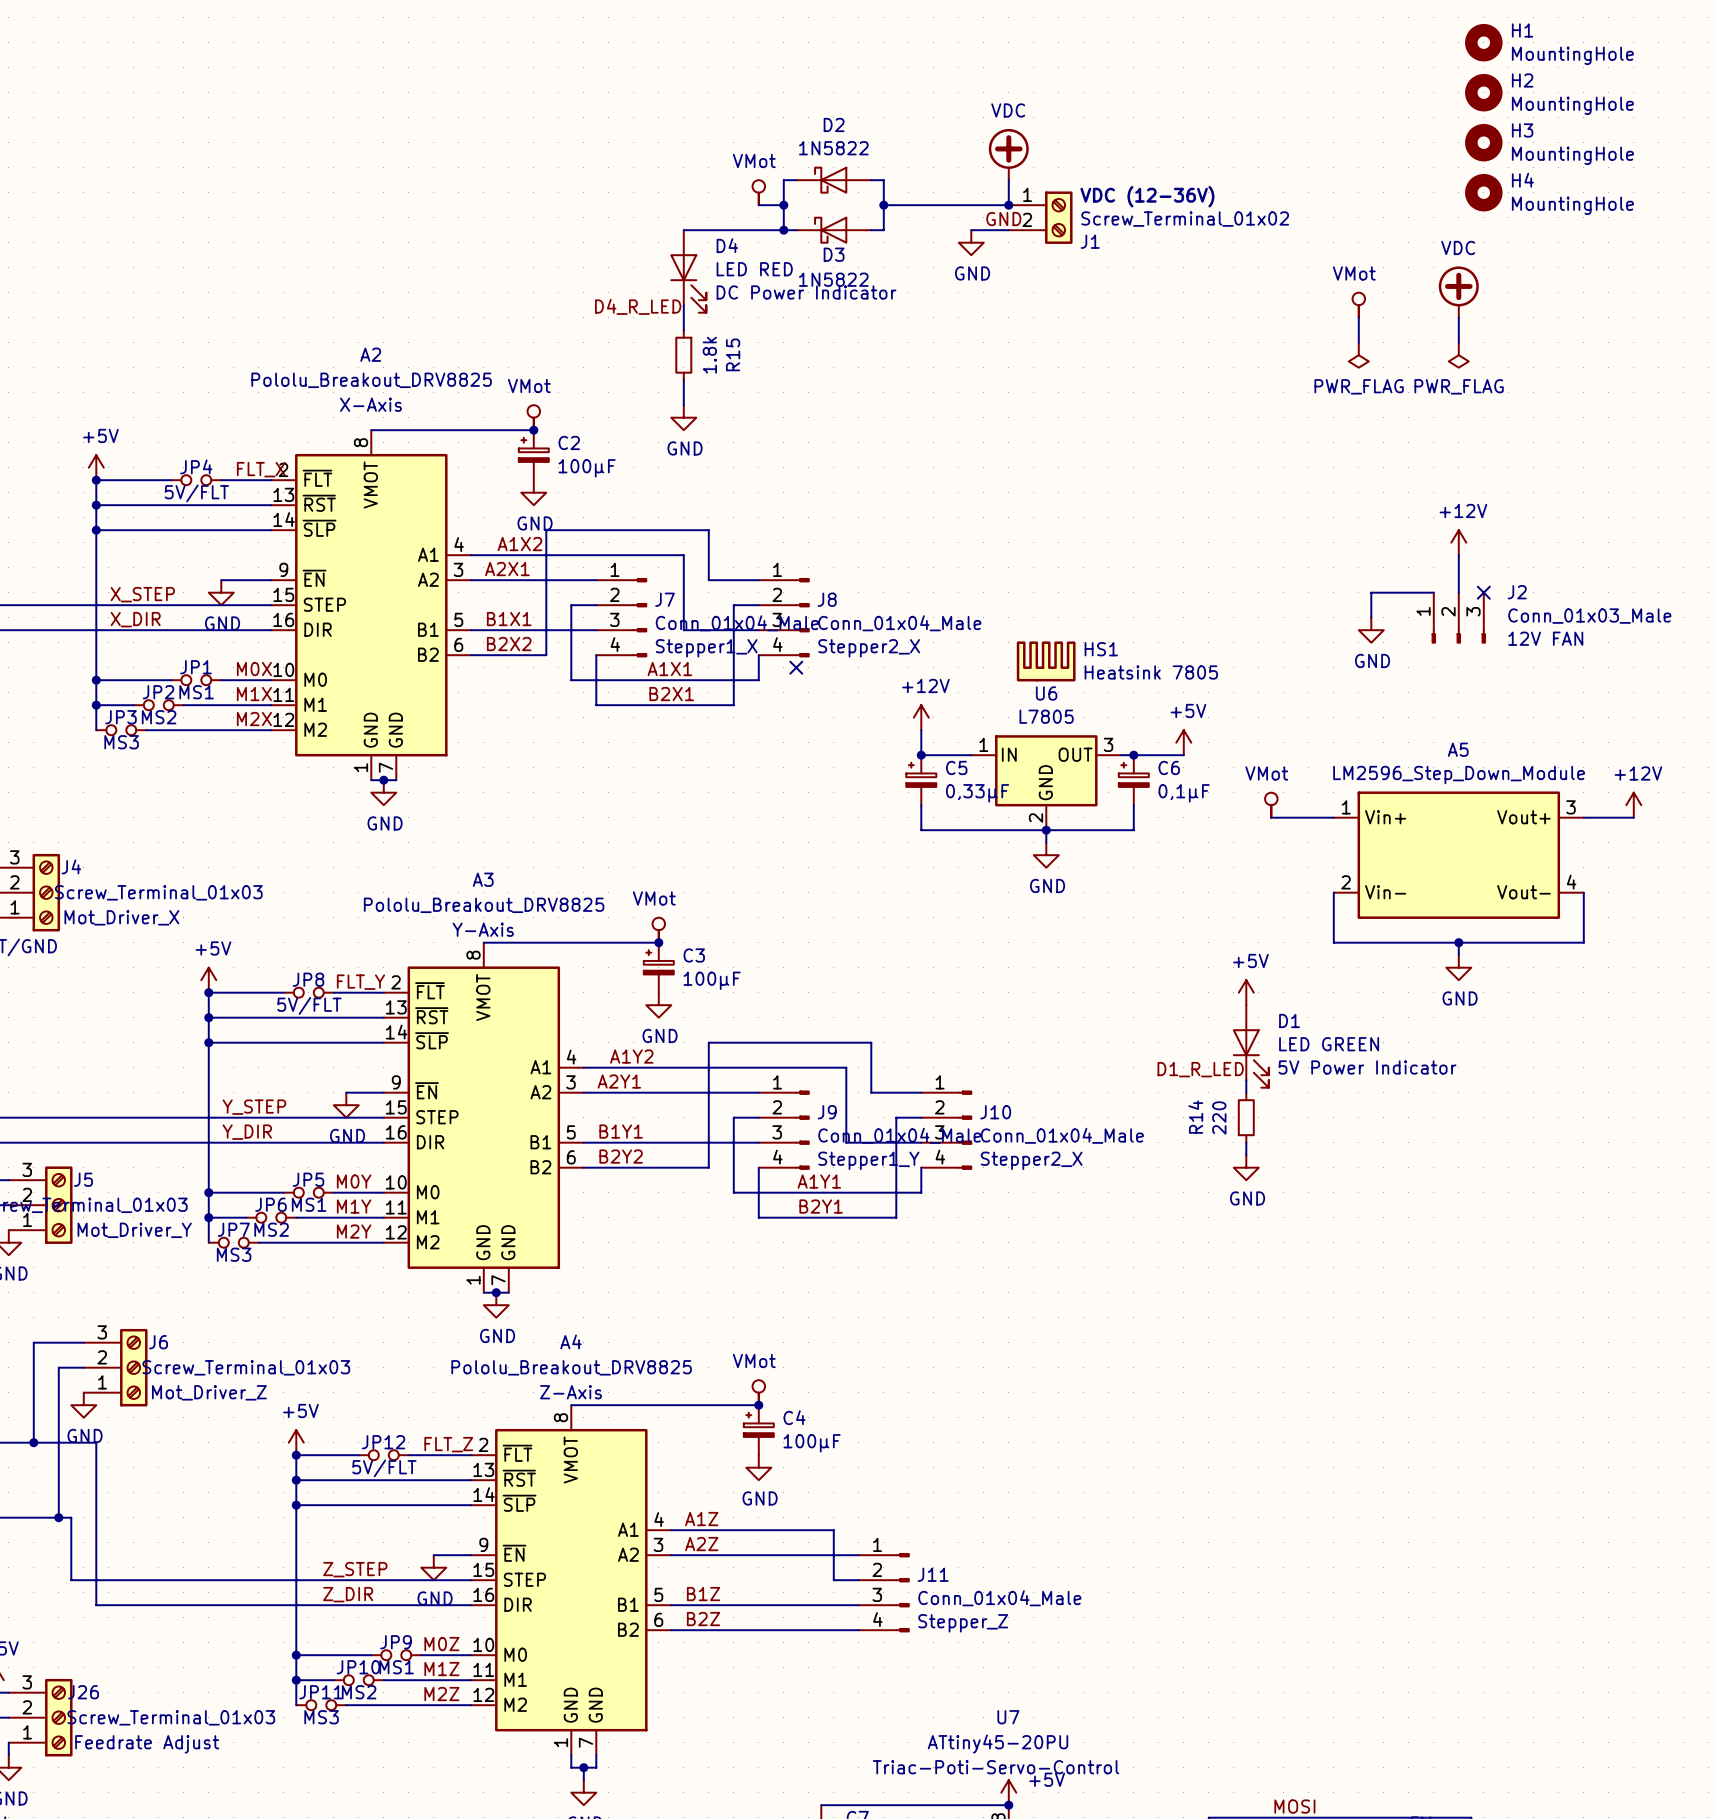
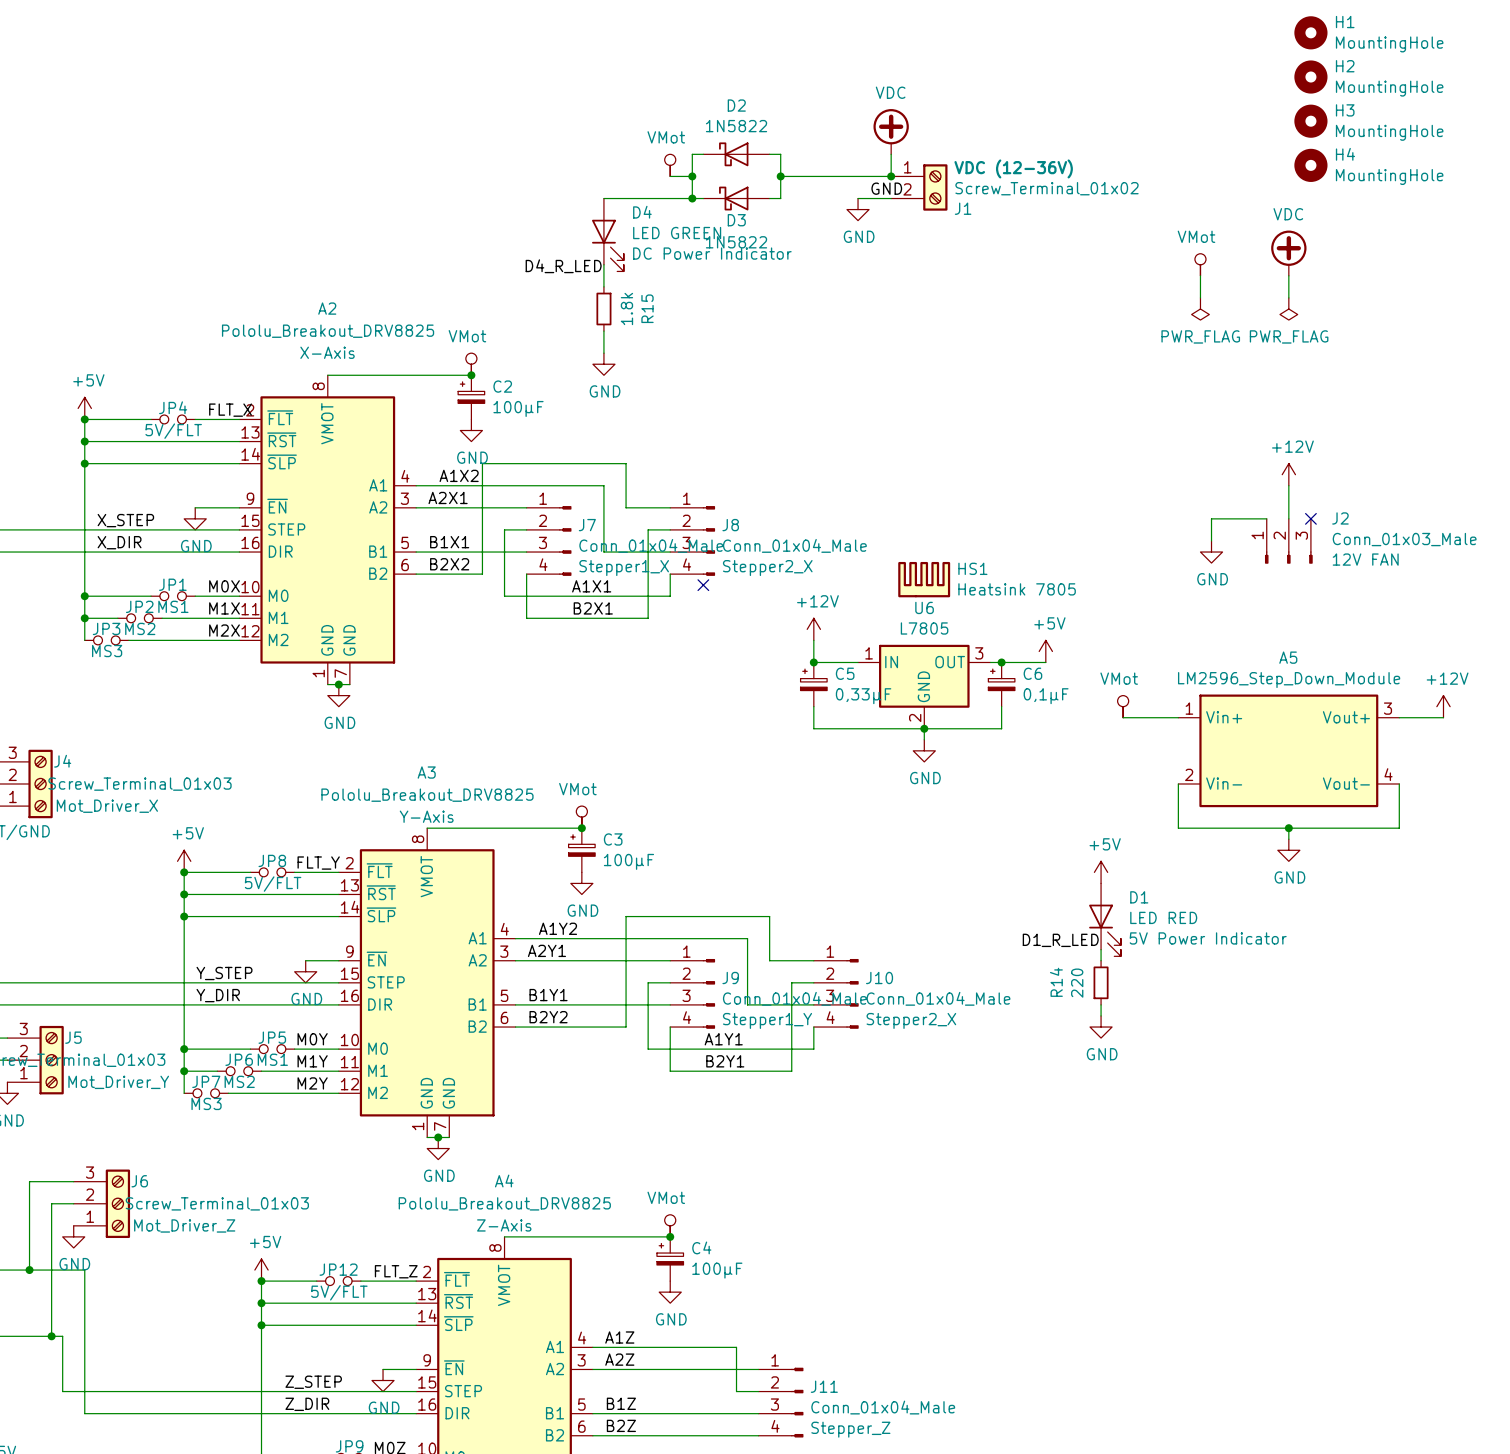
D4 value: LED RED (754, 269) -> LED GREEN (677, 233)
D1 value: LED GREEN (1329, 1044) -> LED RED (1163, 917)

